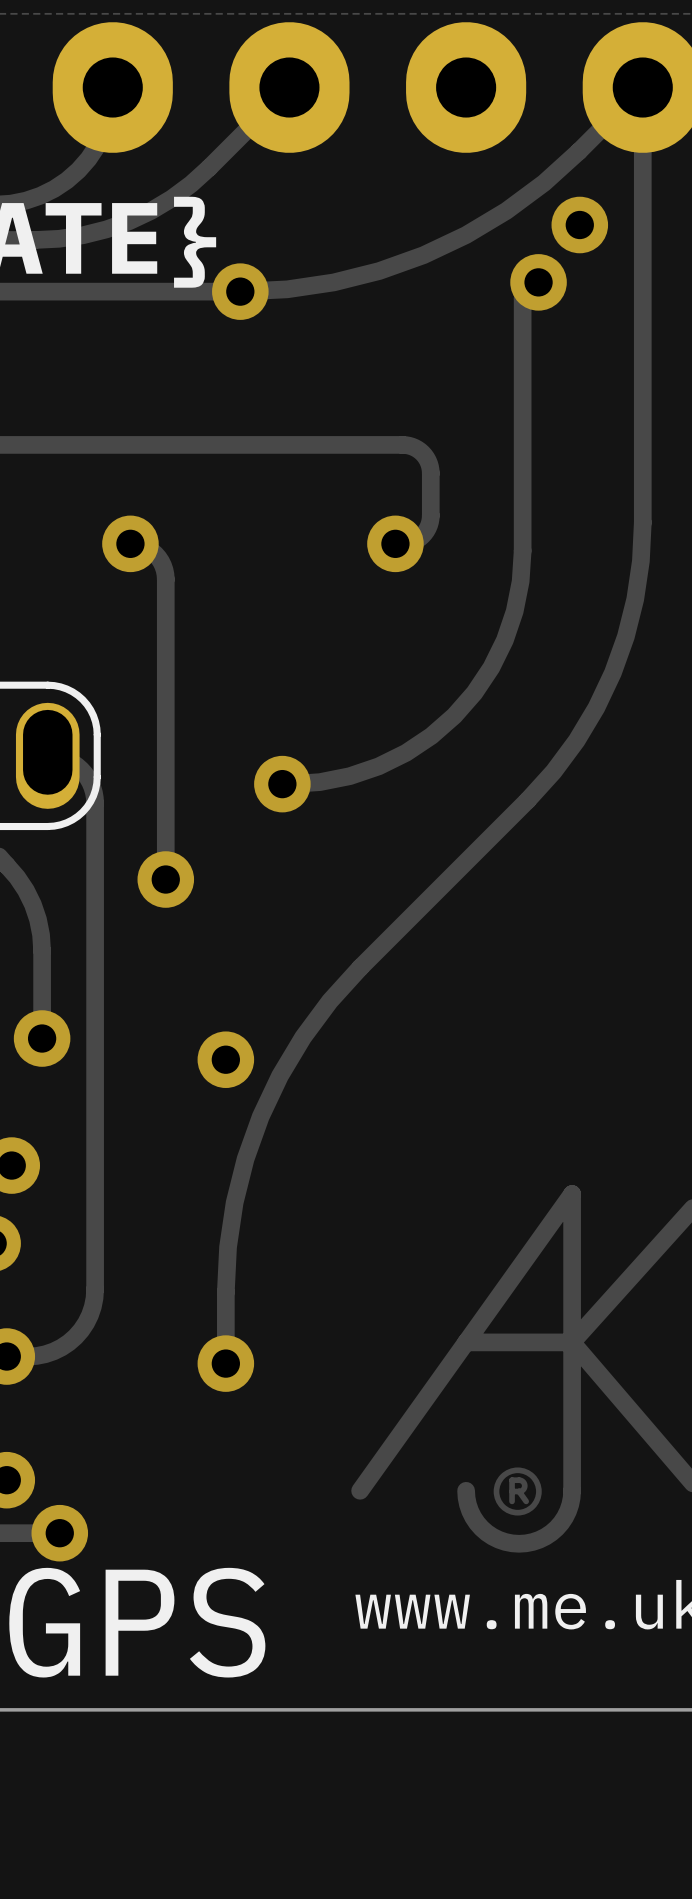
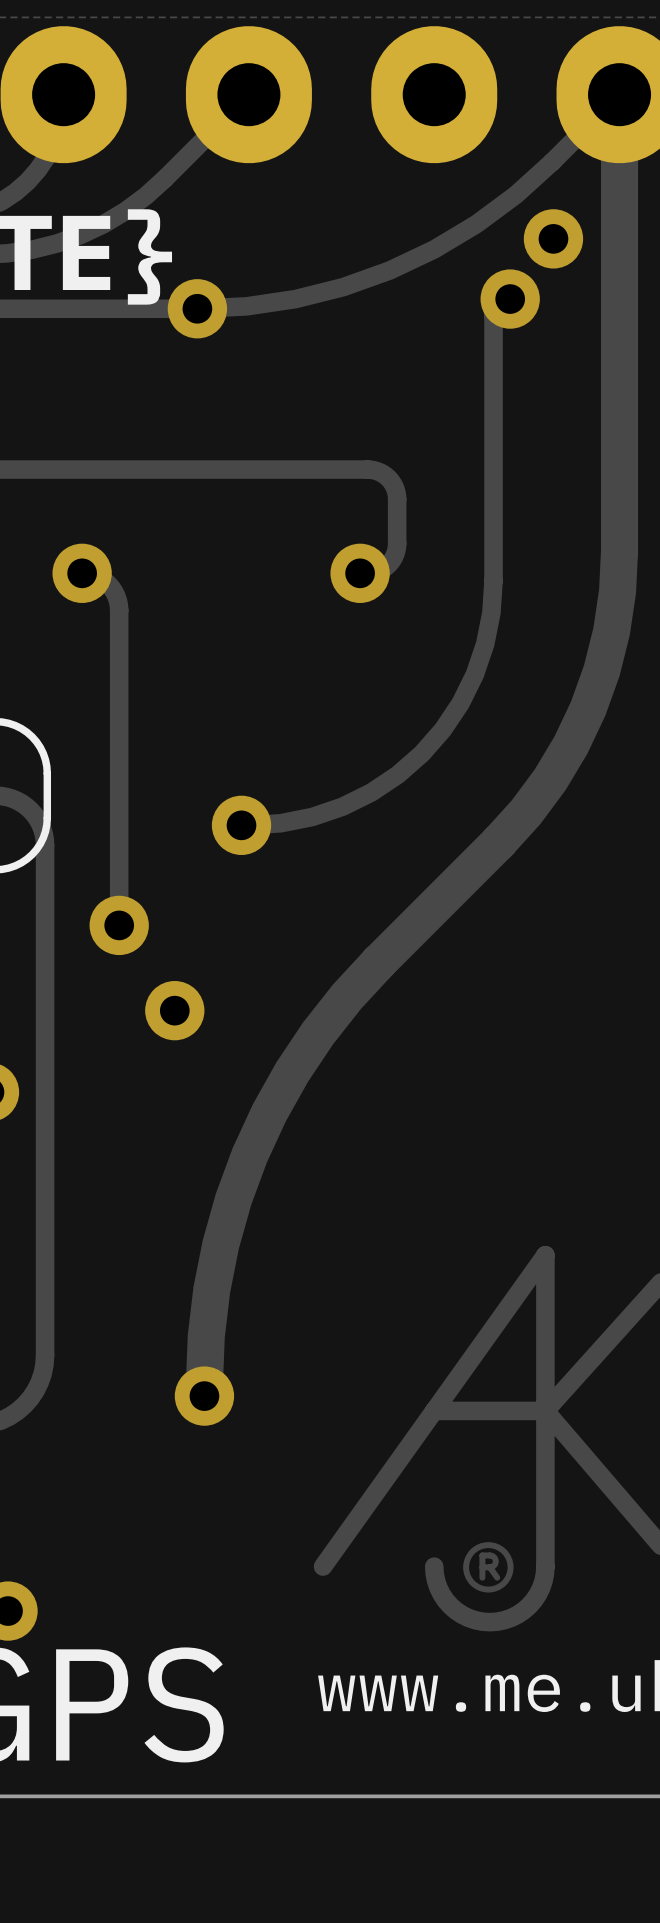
track width: thin (642, 87) (642, 522) (640, 561) (635, 599) (625, 636) (612, 672) (596, 707) (576, 740) (553, 771) (527, 800) (413, 914) -> thick (619, 94) (619, 551) (617, 591) (611, 631) (601, 670) (588, 708) (570, 745) (550, 779) (526, 812) (498, 842) (378, 962)
track: (413, 914) (329, 1001) (303, 1037) (279, 1075) (260, 1116) (245, 1158) (234, 1202) (228, 1247) (225, 1363) -> (378, 962) (346, 996) (318, 1033) (292, 1072) (269, 1113) (249, 1155) (233, 1199) (220, 1244) (211, 1289) (206, 1336) (204, 1396)
via position: (225, 1059) -> (174, 1010)
via position: (225, 1363) -> (204, 1396)

